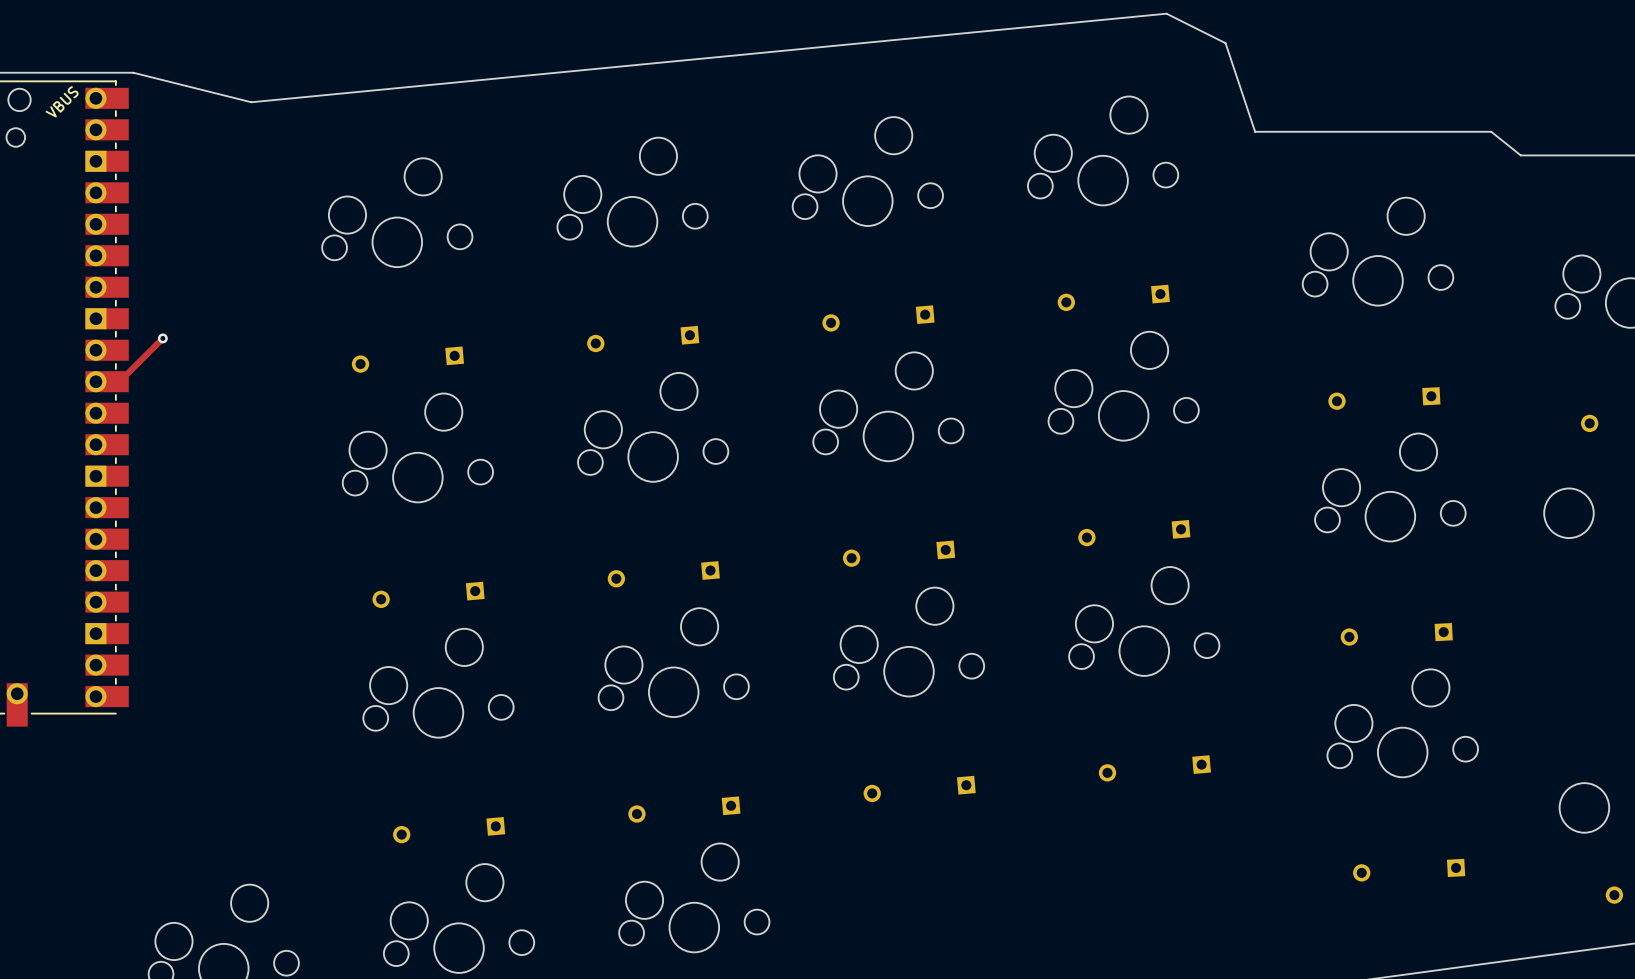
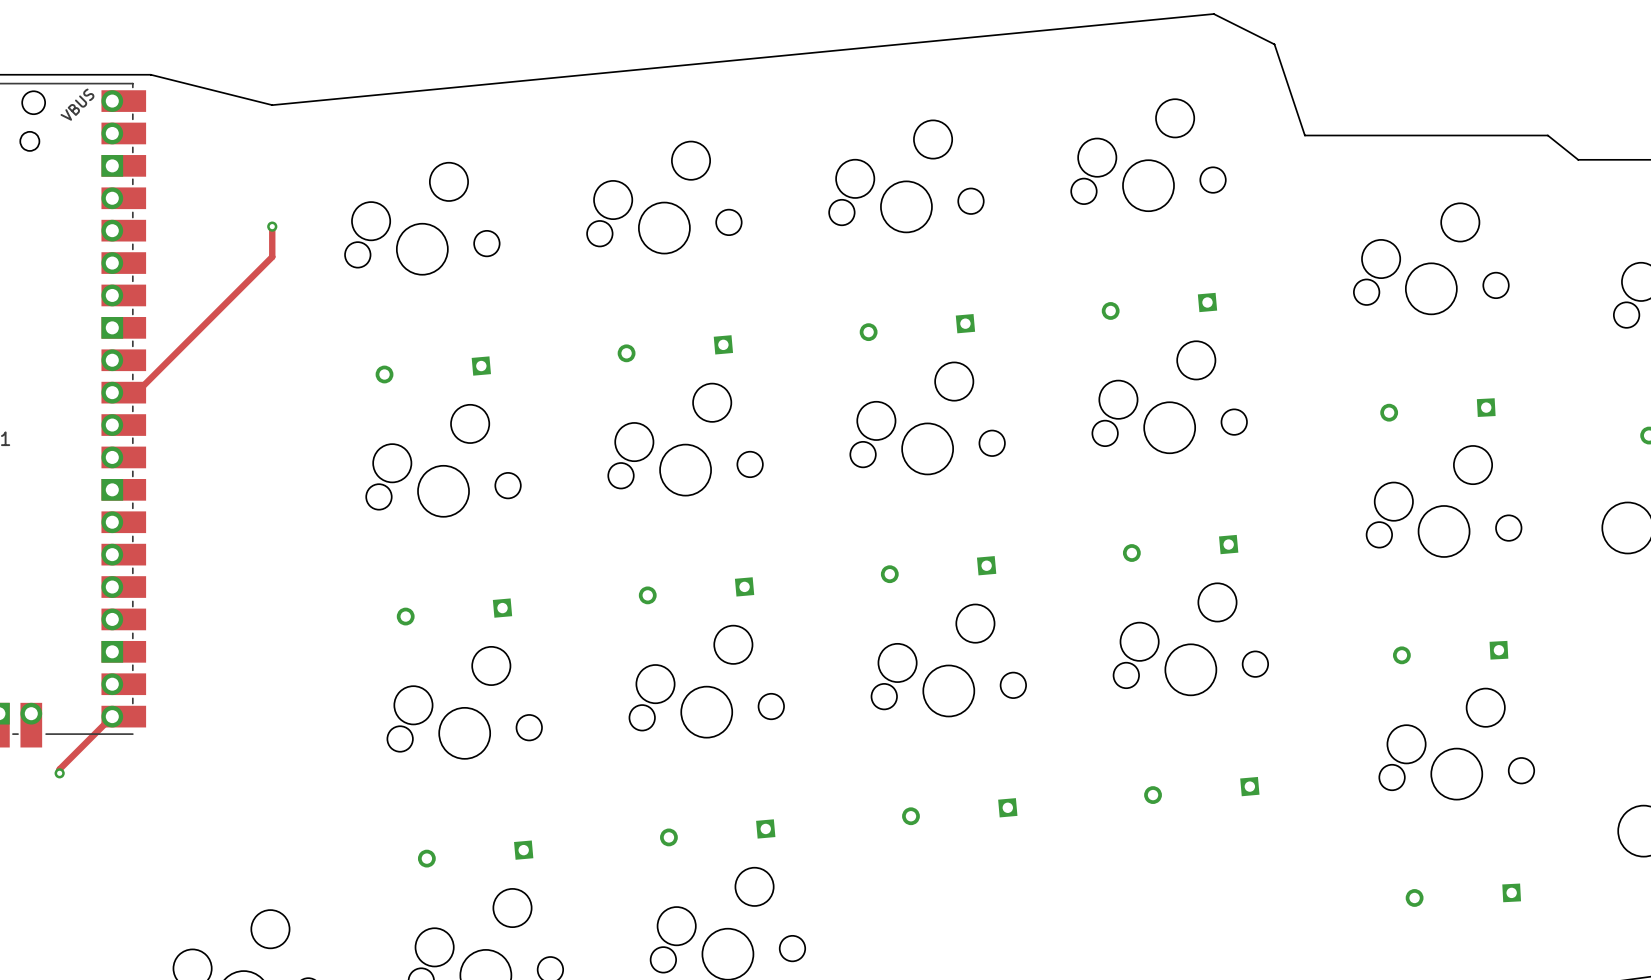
track: none -> (272, 226) (272, 256) (181, 348)
via: none -> (272, 226)
via: (162, 338) -> none
track: none -> (112, 716) (59, 769) (59, 773)
via: none -> (59, 773)

